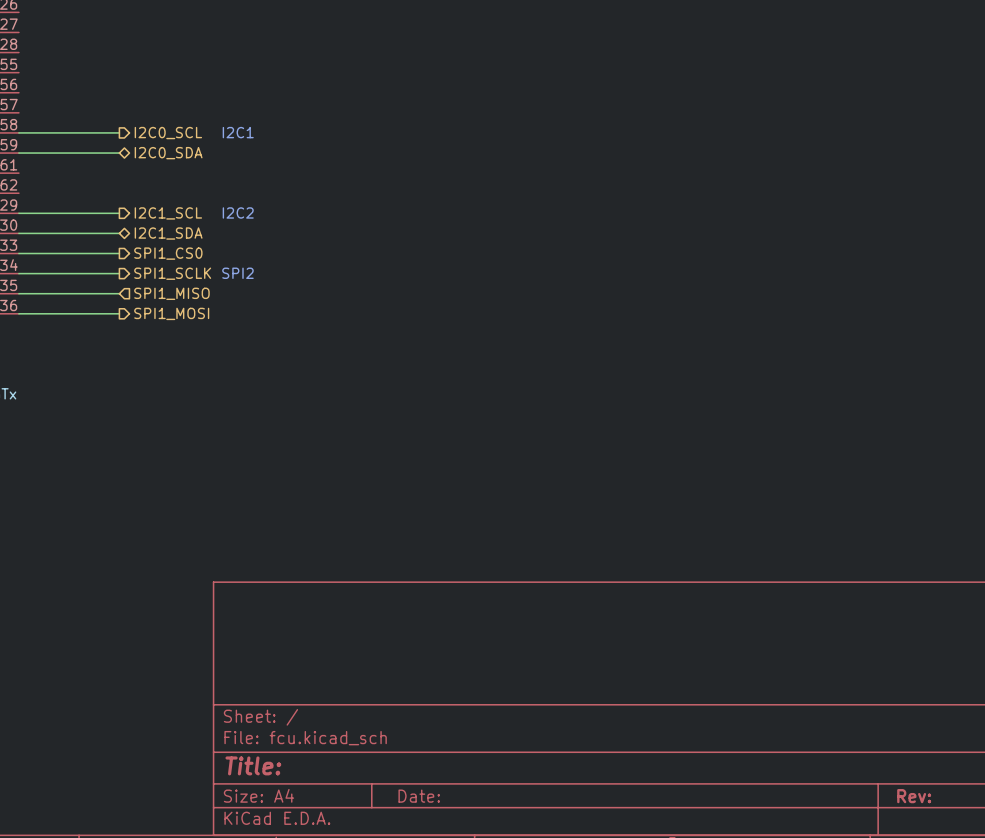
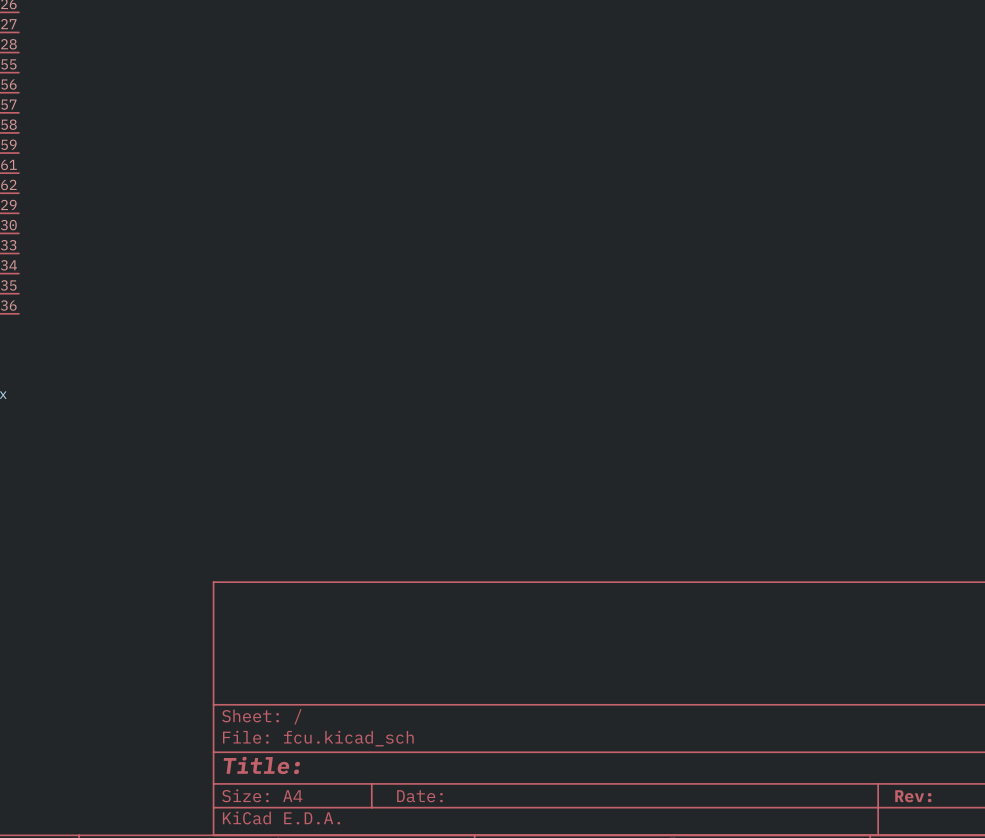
wire: (18, 132) (119, 132) -> none
text: I2C1 (238, 132) -> none
hierarchical label: I2C0_SCL (168, 133) -> none
wire: (18, 153) (119, 153) -> none
hierarchical label: I2C0_SDA (168, 153) -> none
text: I2C2 (238, 212) -> none
wire: (18, 213) (119, 213) -> none
hierarchical label: I2C1_SCL (168, 213) -> none
wire: (18, 233) (119, 233) -> none
hierarchical label: I2C1_SDA (168, 233) -> none
wire: (18, 253) (119, 253) -> none
hierarchical label: SPI1_CS0 (168, 253) -> none
wire: (18, 273) (119, 273) -> none
hierarchical label: SPI1_SCLK (172, 273) -> none
text: SPI2 (237, 273) -> none
wire: (18, 293) (119, 293) -> none
hierarchical label: SPI1_MISO (171, 293) -> none
wire: (18, 313) (119, 313) -> none
hierarchical label: SPI1_MOSI (171, 313) -> none

